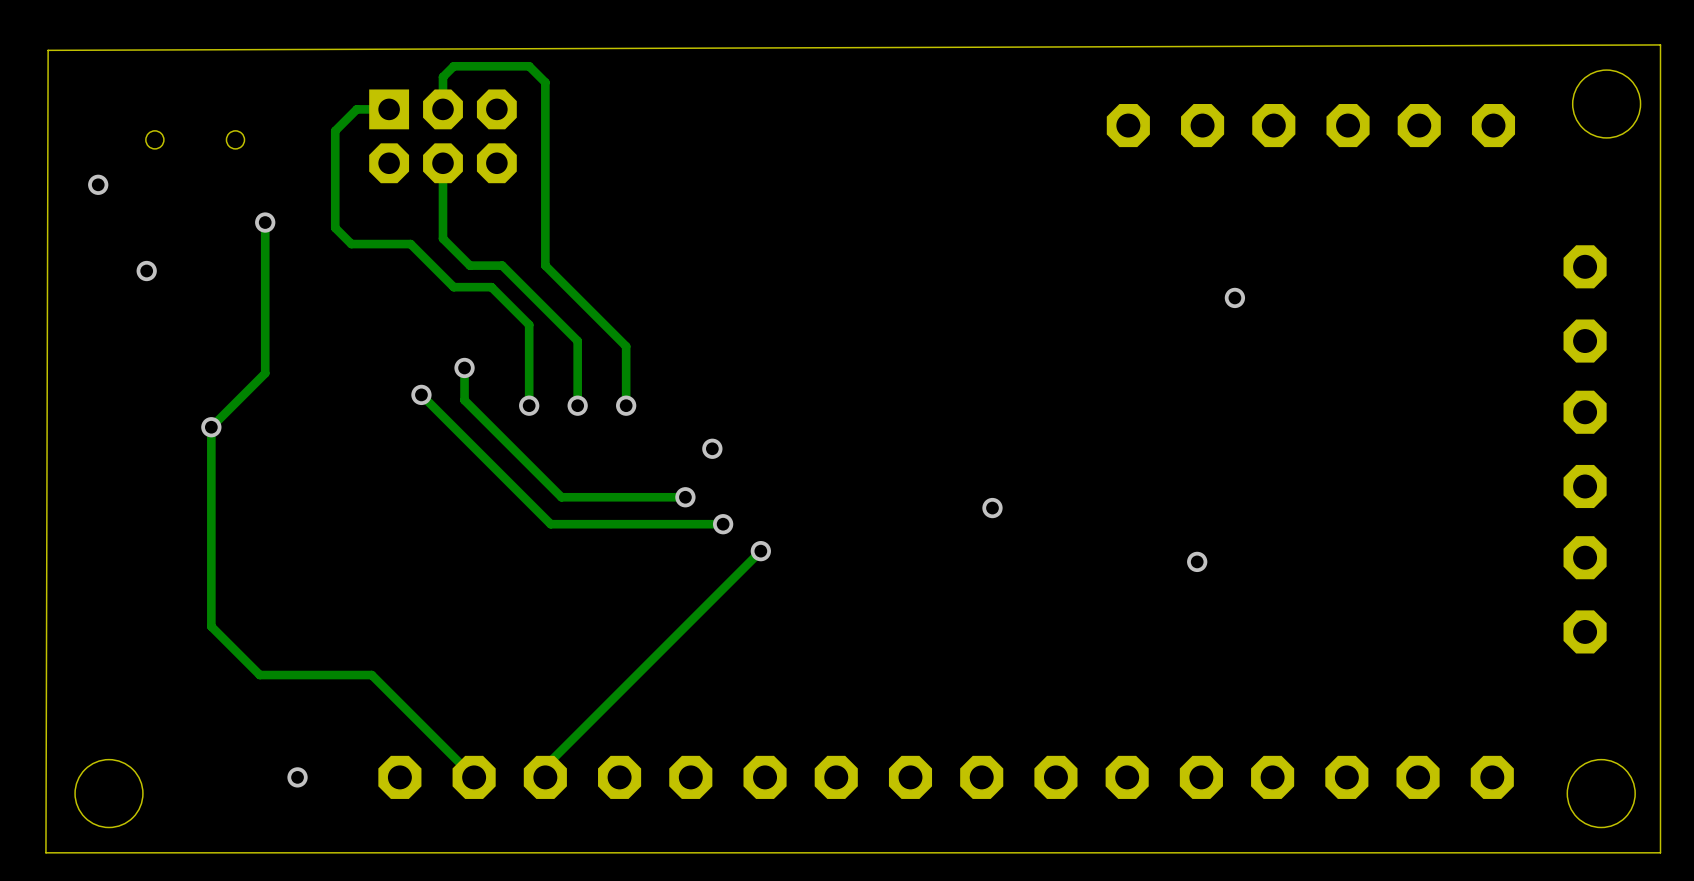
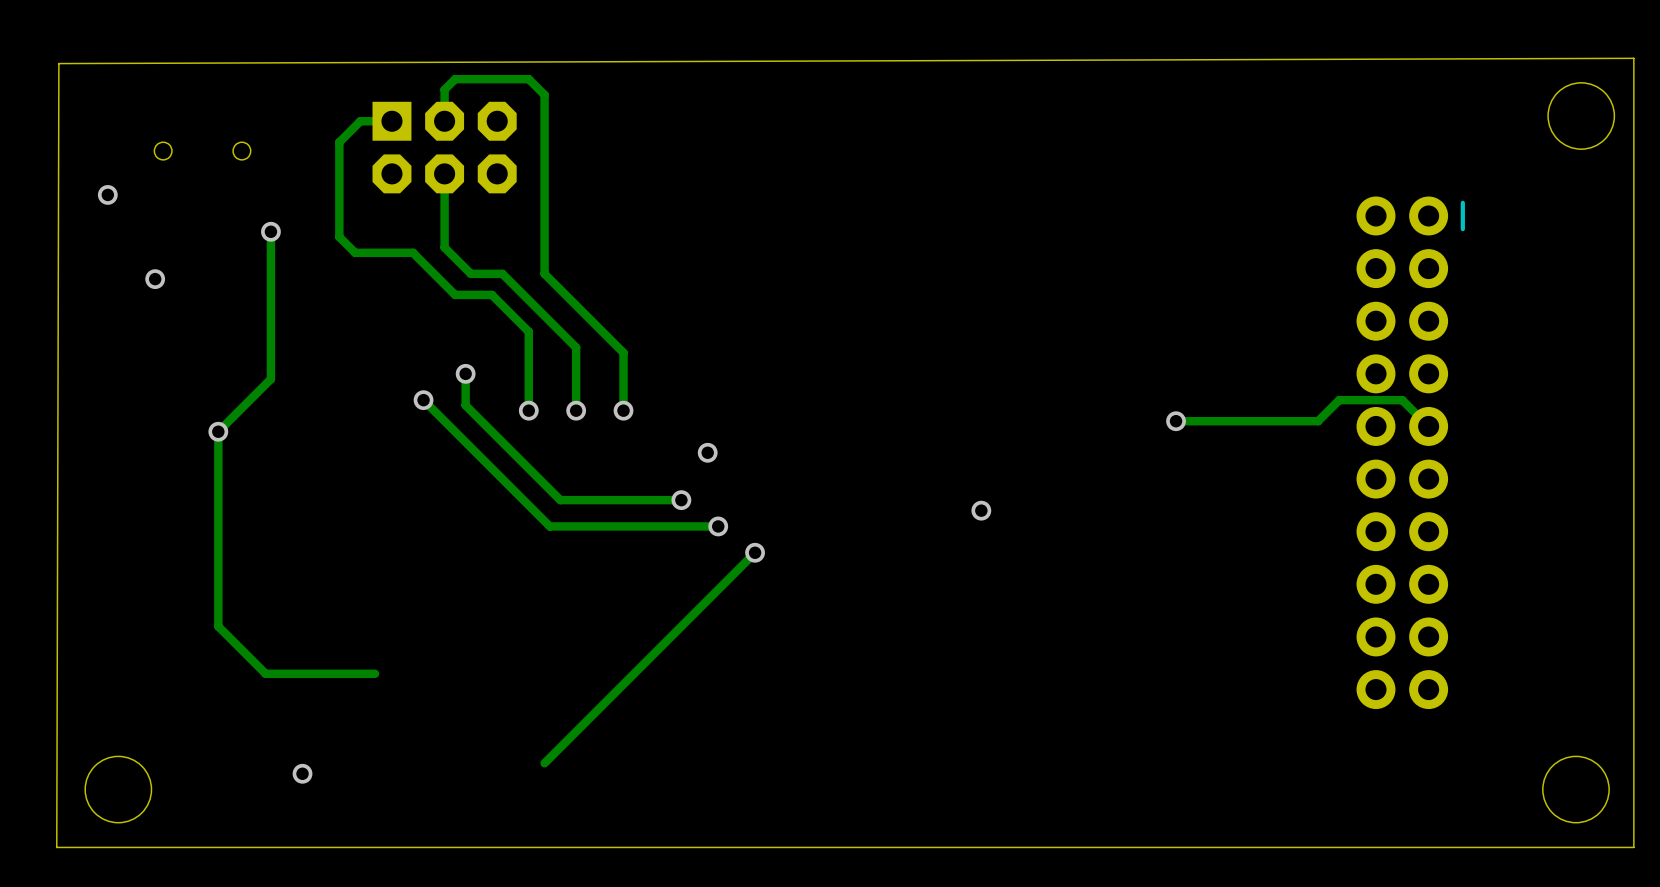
part: (1165, 125) -> none
part: (1310, 125) -> none
part: (1456, 125) -> none
via: (1234, 297) -> none
part: (1585, 303) -> none
track: none -> (1176, 421) (1318, 421) (1339, 400) (1402, 400) (1428, 426)
via: none -> (1176, 421)
part: none -> (1410, 452)
part: (1585, 449) -> none
via: (1197, 561) -> none
part: (1585, 594) -> none
track: (371, 675) (474, 777) -> none
part: (437, 777) -> none
part: (582, 777) -> none
part: (727, 777) -> none
part: (873, 777) -> none
part: (1018, 777) -> none
part: (1164, 777) -> none
part: (1309, 777) -> none
part: (1455, 777) -> none

